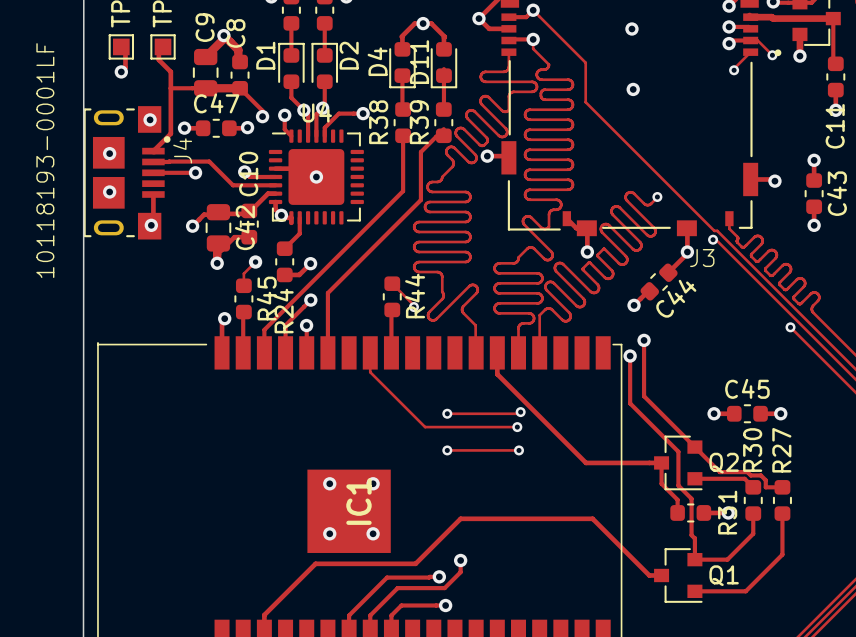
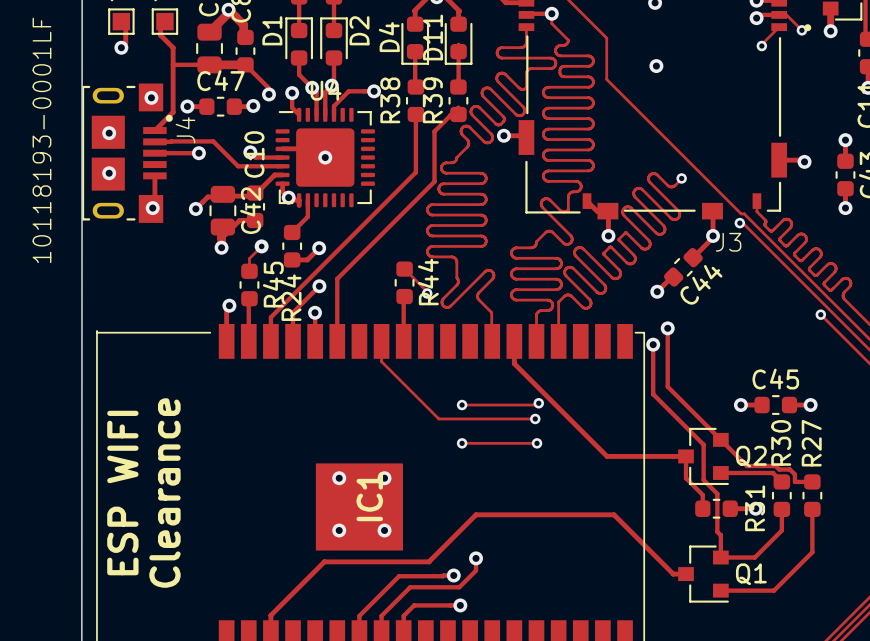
text: none -> ESP WIFI (122, 493)
text: none -> Clearance (164, 493)

